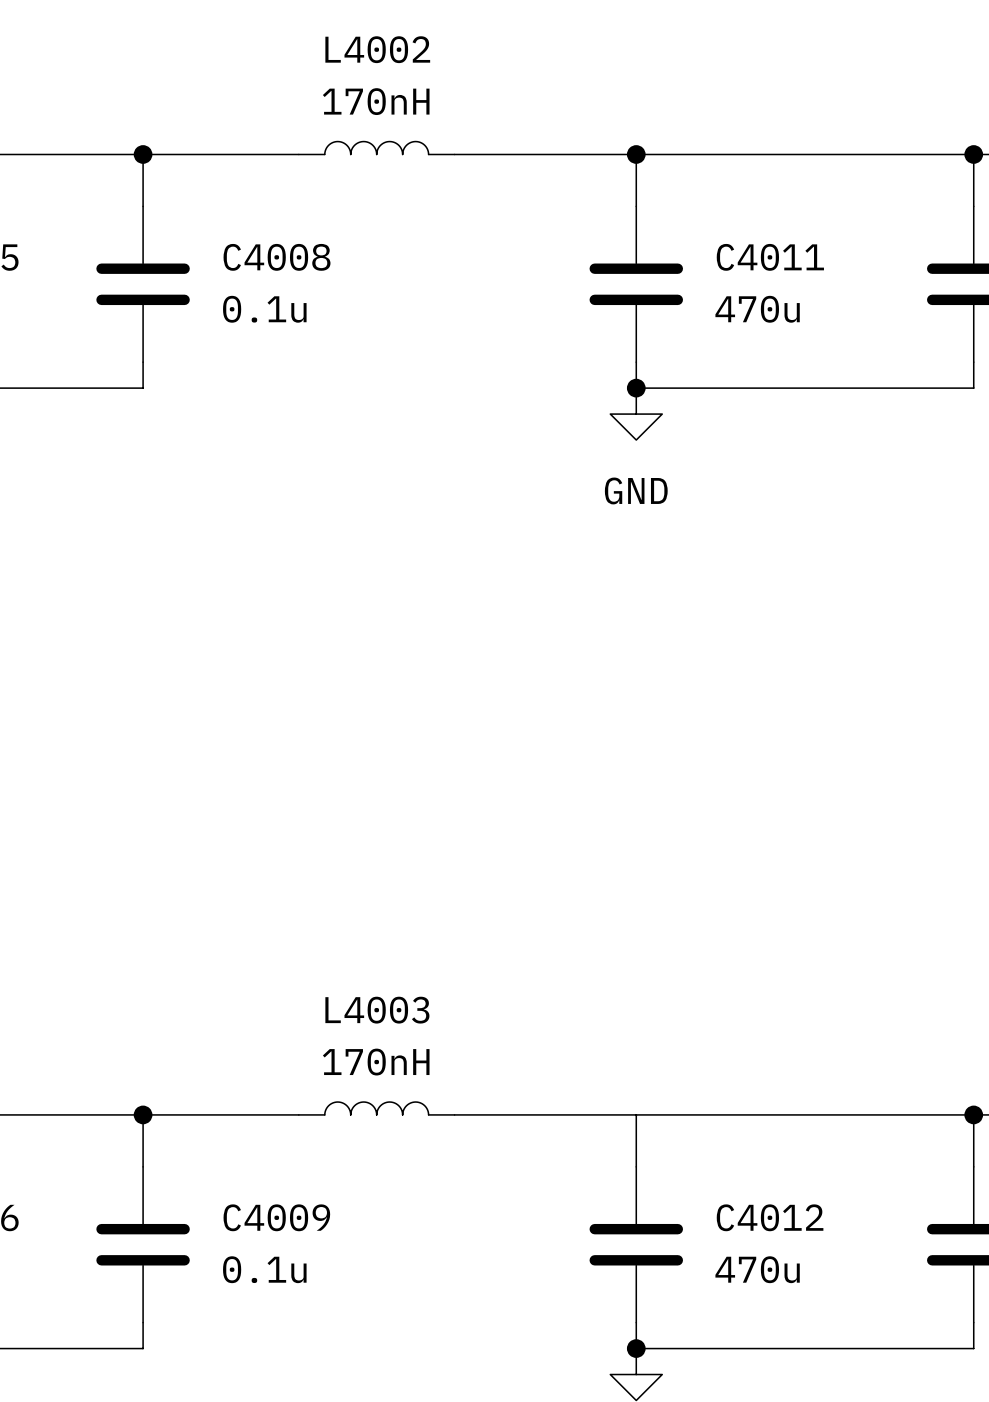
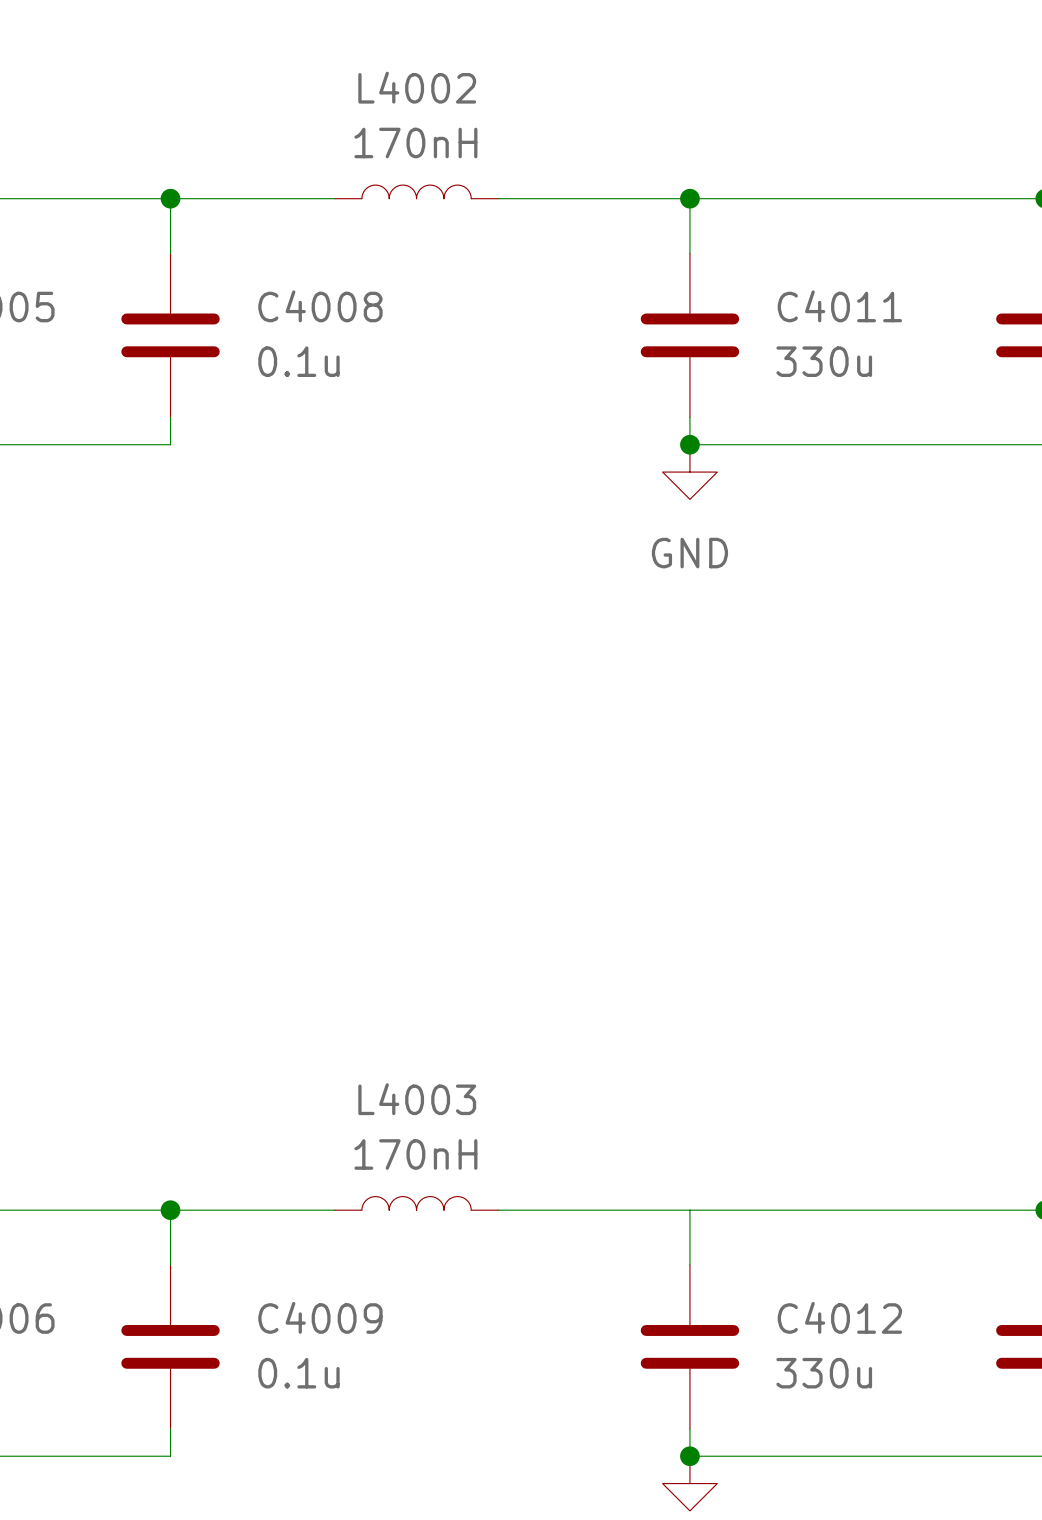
C4011 value: 470u (757, 309) -> 330u (824, 361)
C4012 value: 470u (757, 1269) -> 330u (824, 1373)

